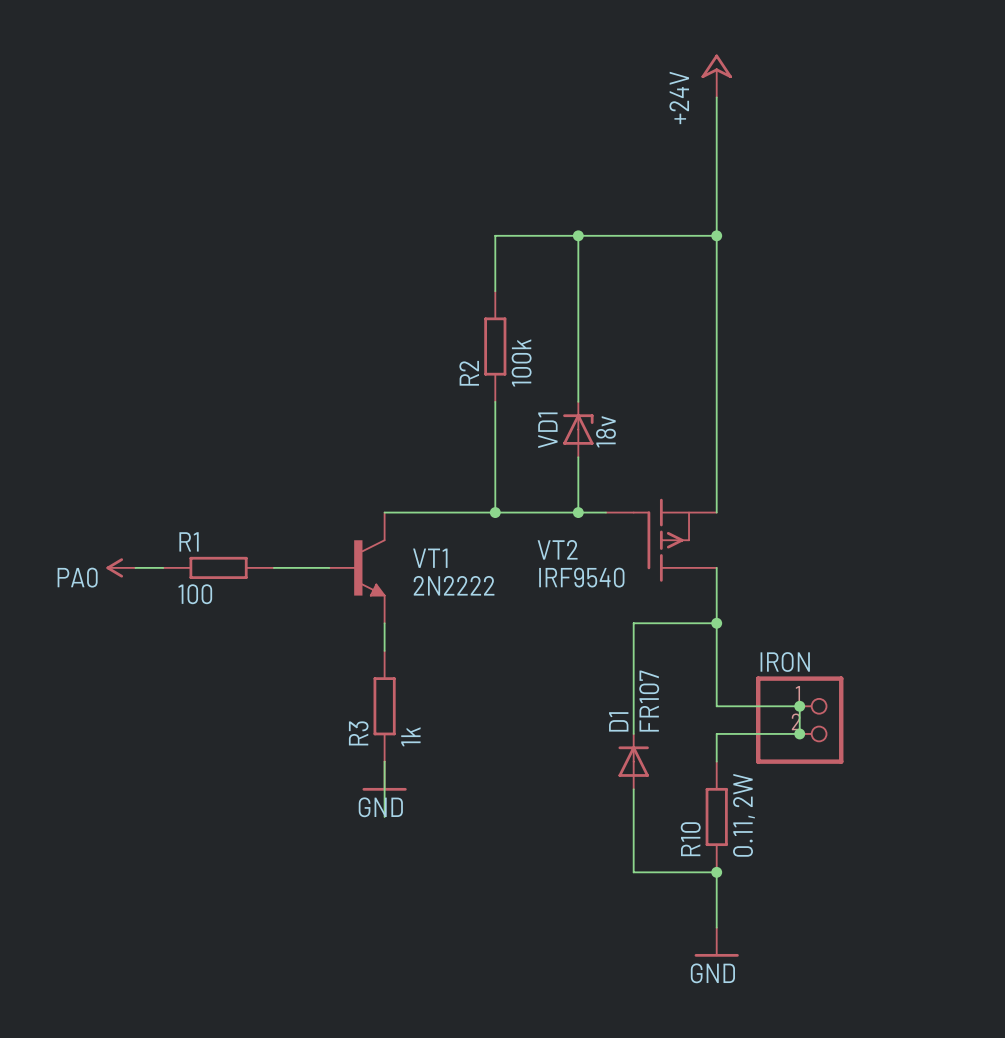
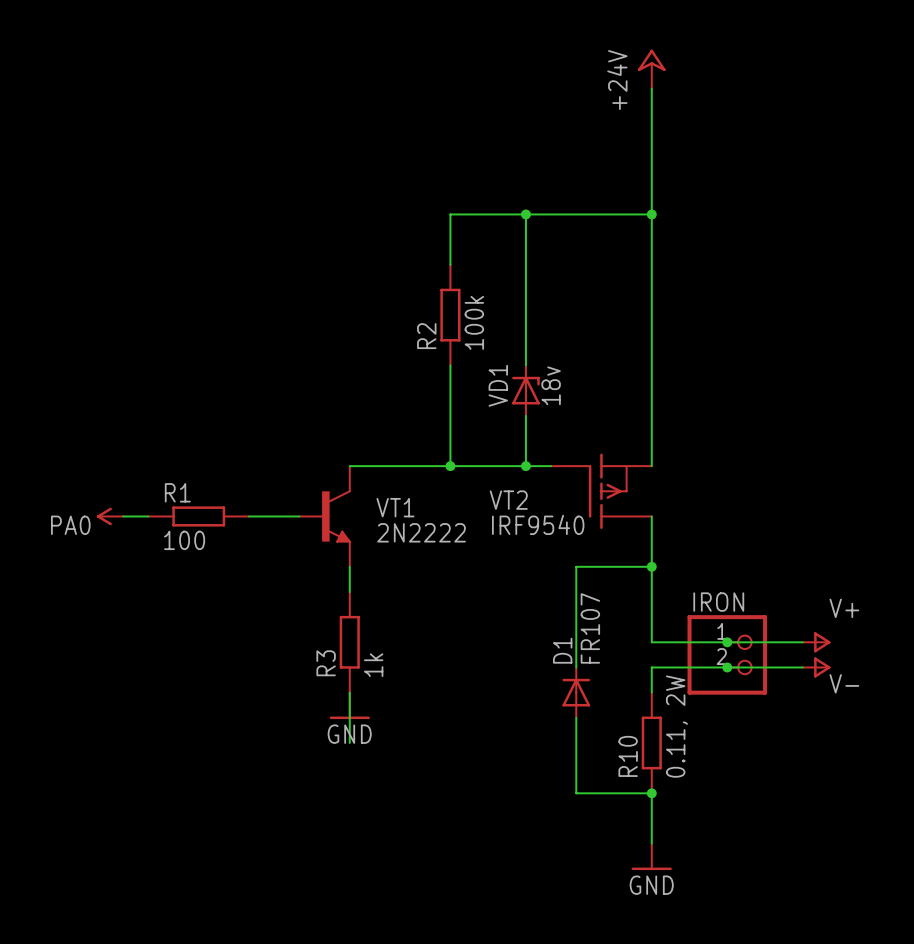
wire: (799, 706) (799, 733) -> (727, 642) (802, 642)
power symbol: none -> V+ (816, 642)
wire: none -> (727, 667) (802, 667)
power symbol: none -> V- (816, 667)

